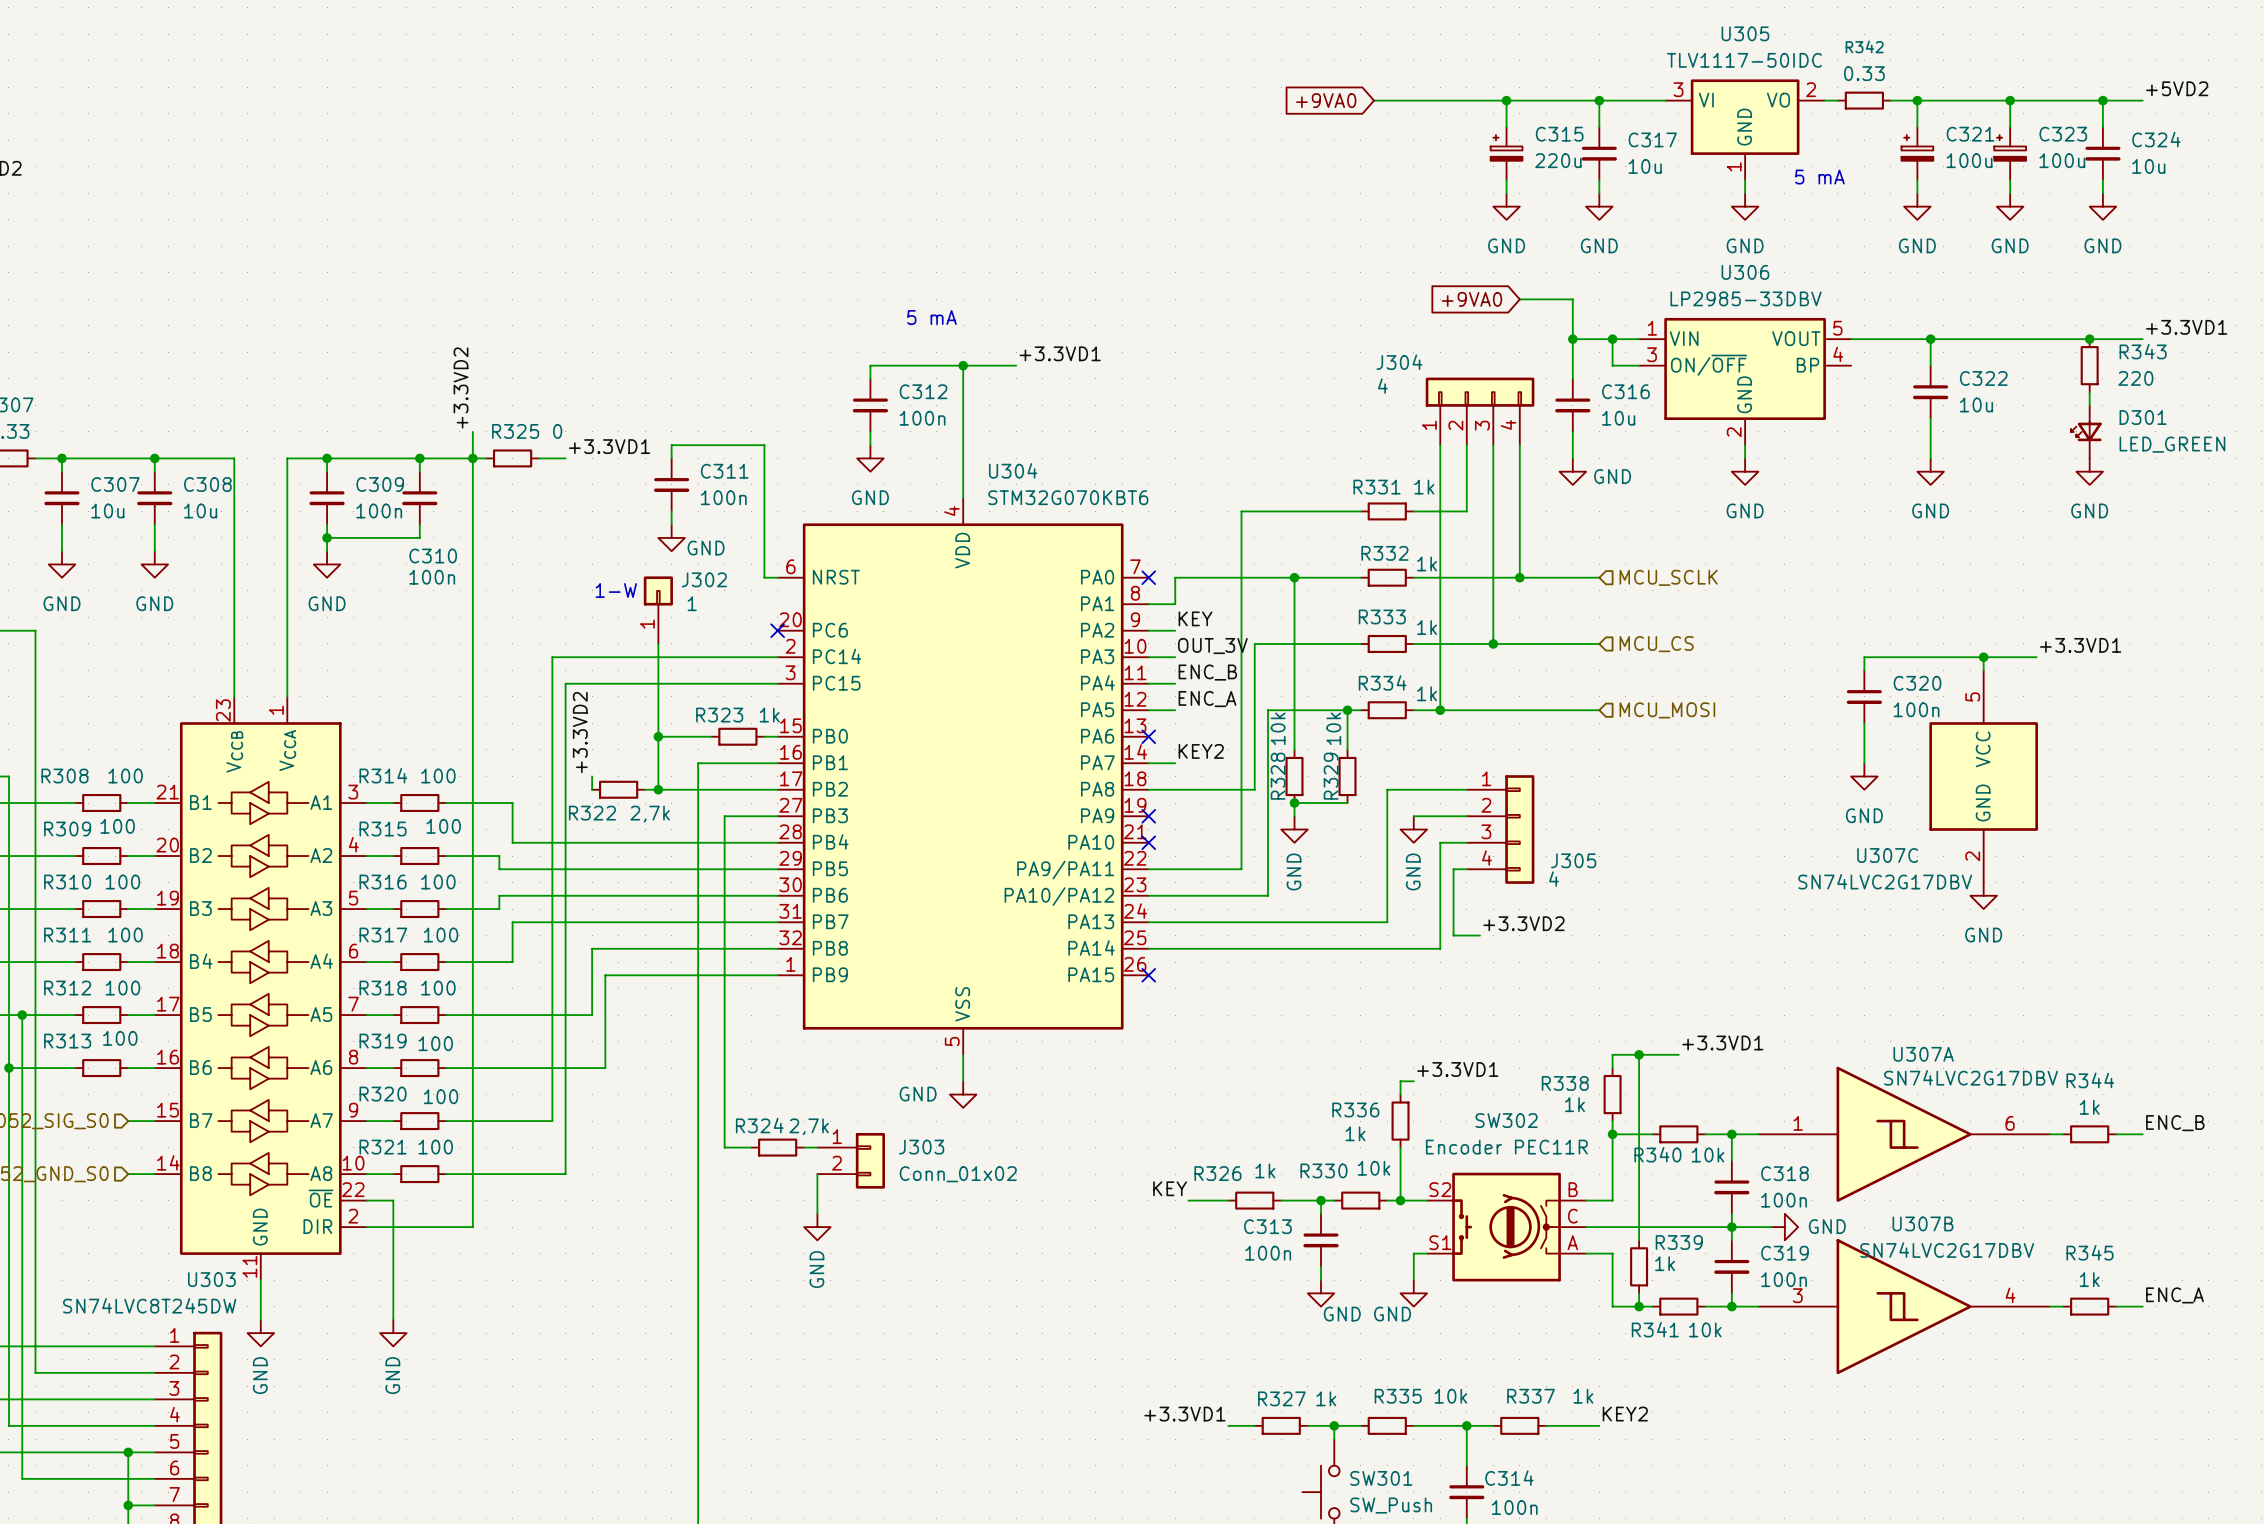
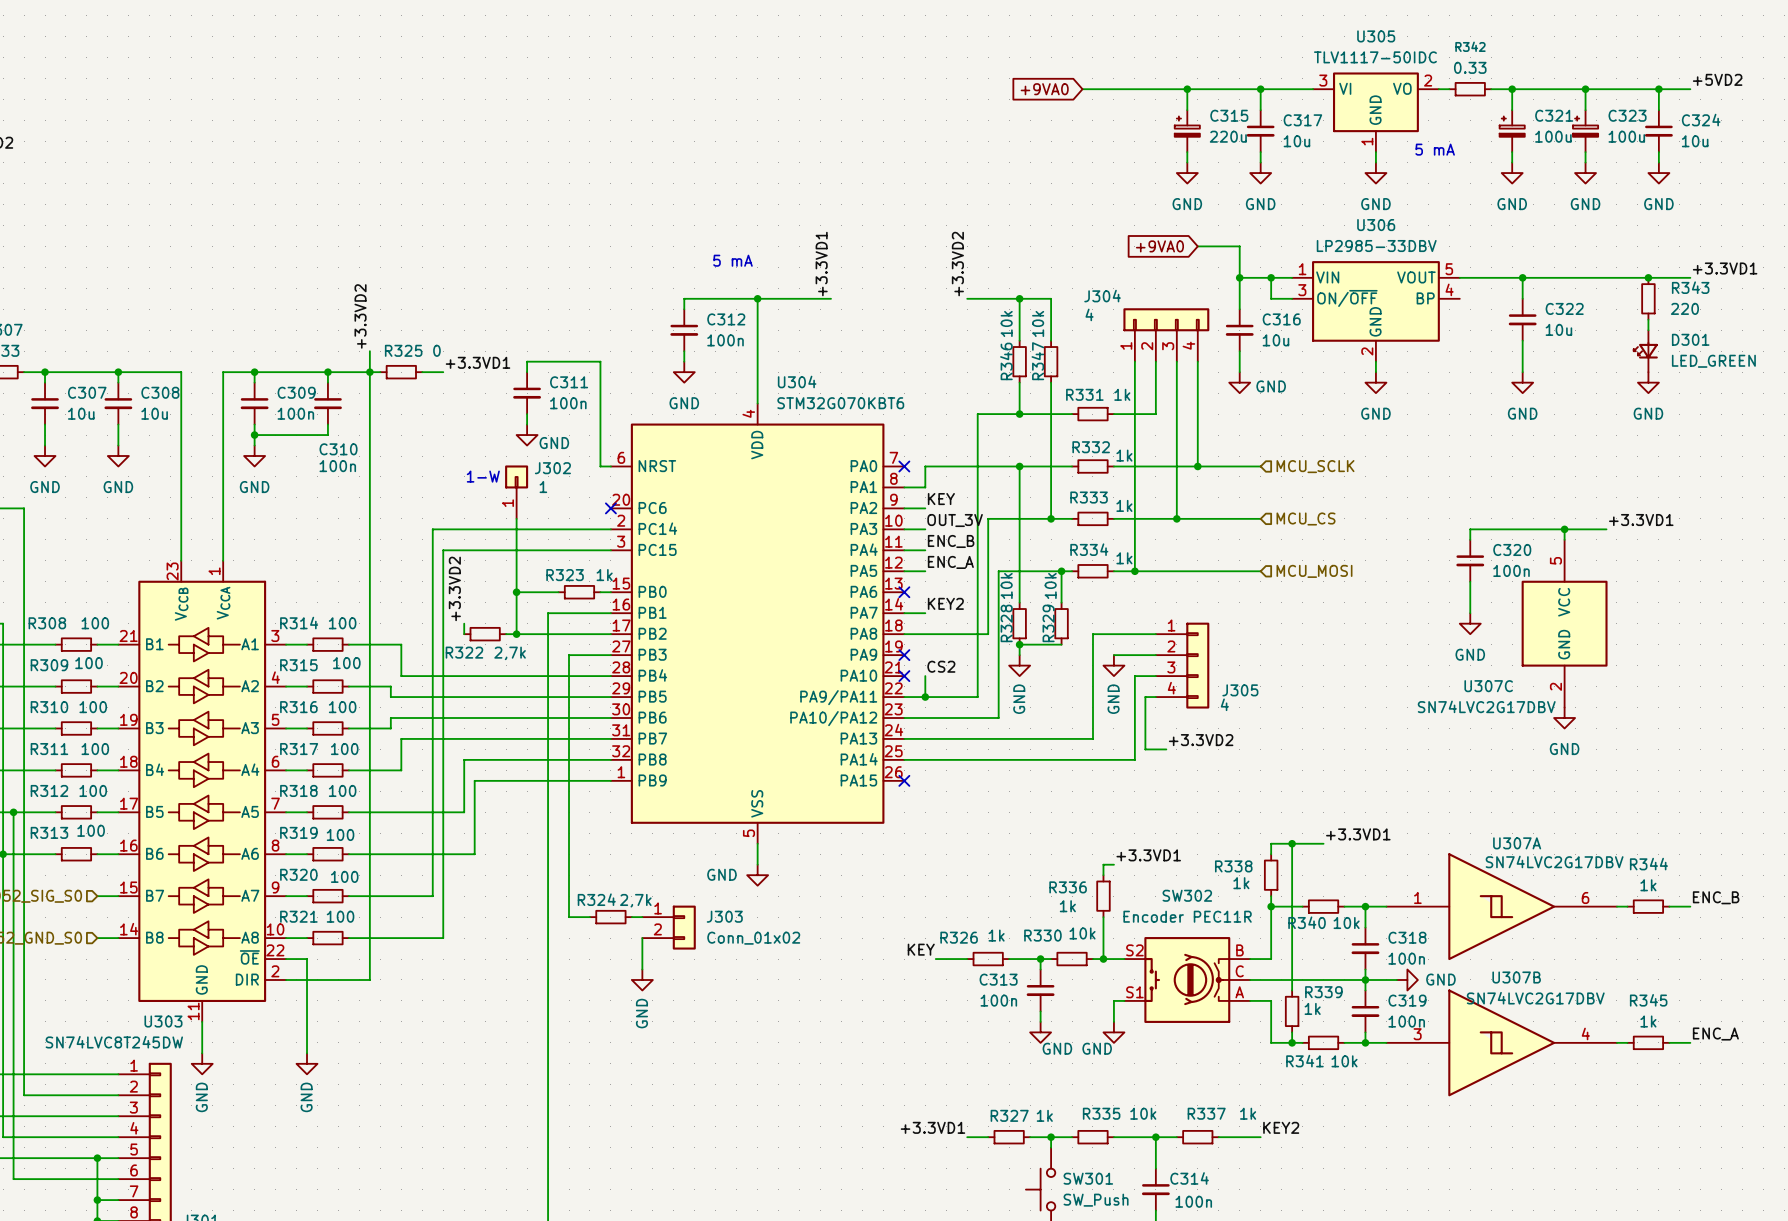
label: none -> +3.3VD2 (957, 264)
label rotation: 0° (1060, 353) -> 90° counterclockwise (821, 264)
wire: none -> (799, 298) (831, 298)
wire: none -> (967, 298) (1051, 298) (1051, 340)
wire: none -> (1019, 298) (1019, 340)
junction: none -> (1019, 298)
R346: none -> 10k (1019, 361)
R347: none -> 10k (1051, 361)
wire: none -> (1019, 382) (1019, 414)
wire: none -> (1051, 382) (1051, 518)
junction: none -> (1019, 414)
junction: none -> (1051, 518)
label: none -> CS2 (941, 666)
wire: none -> (925, 676) (925, 697)
junction: none -> (925, 697)

